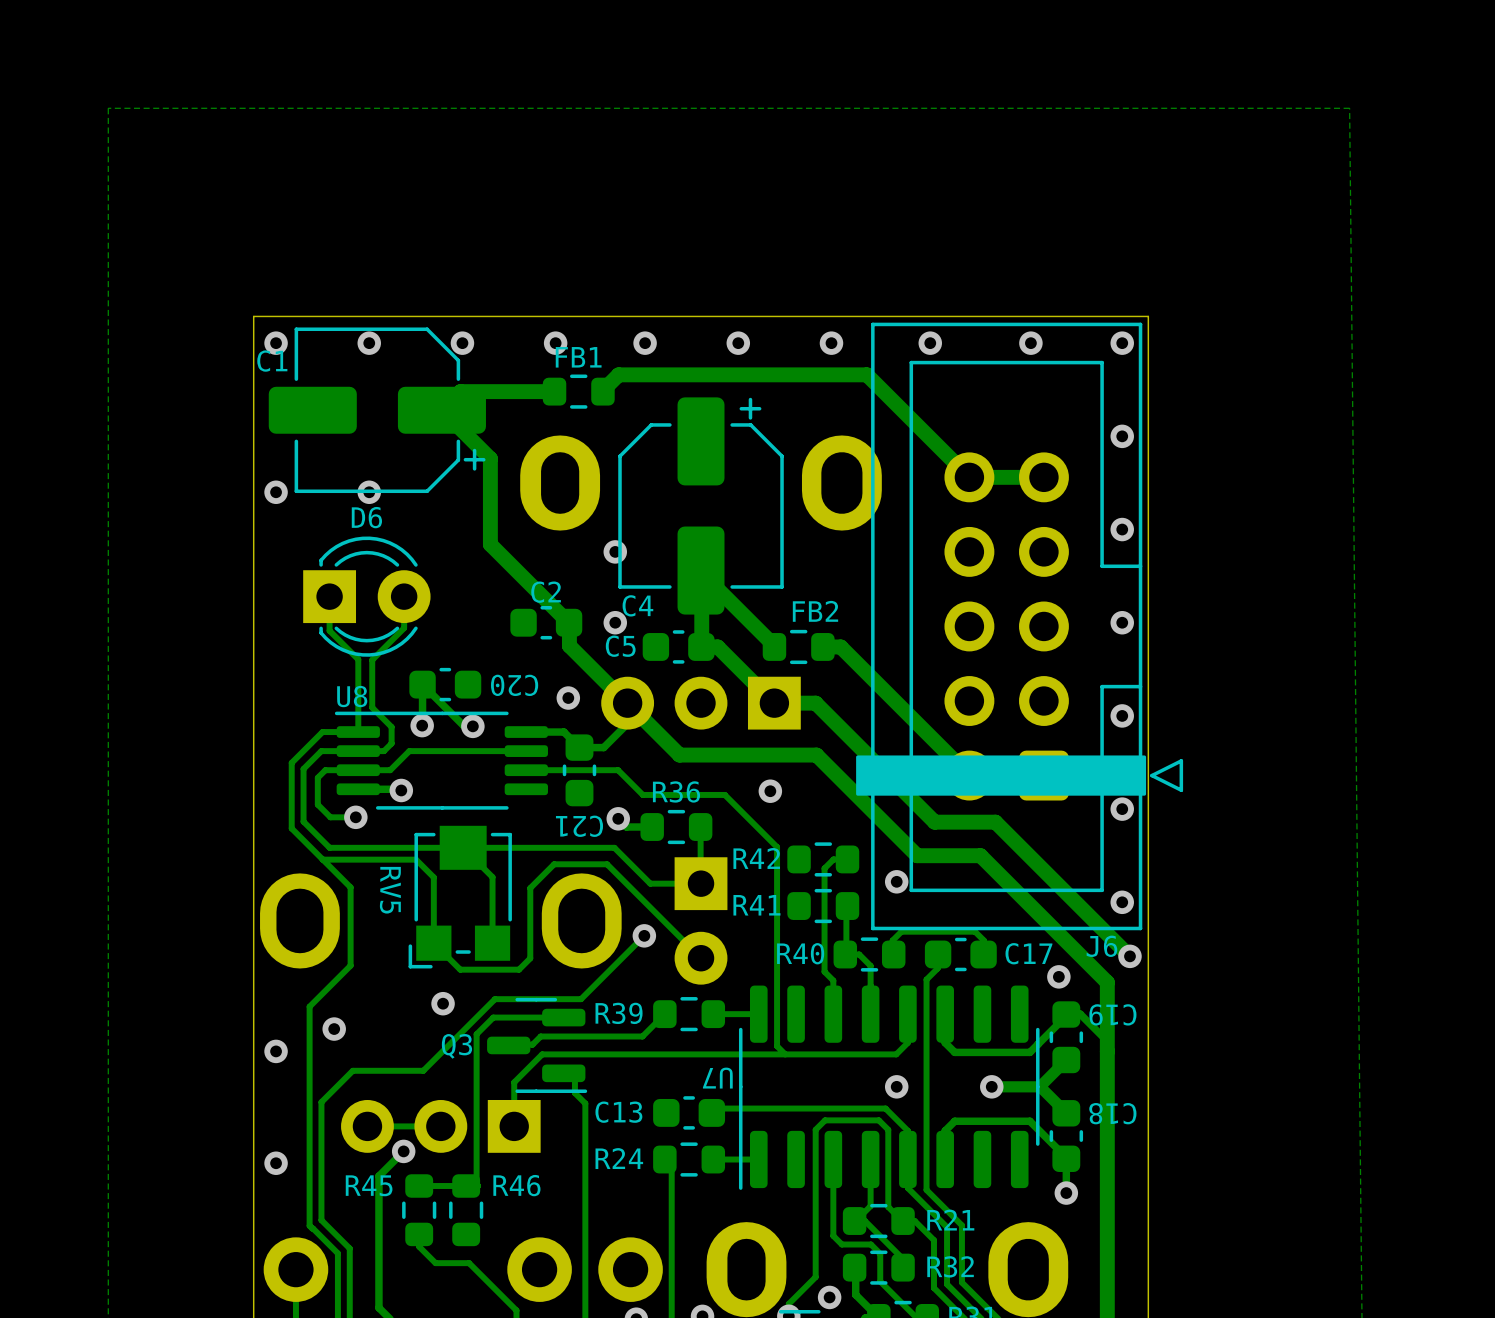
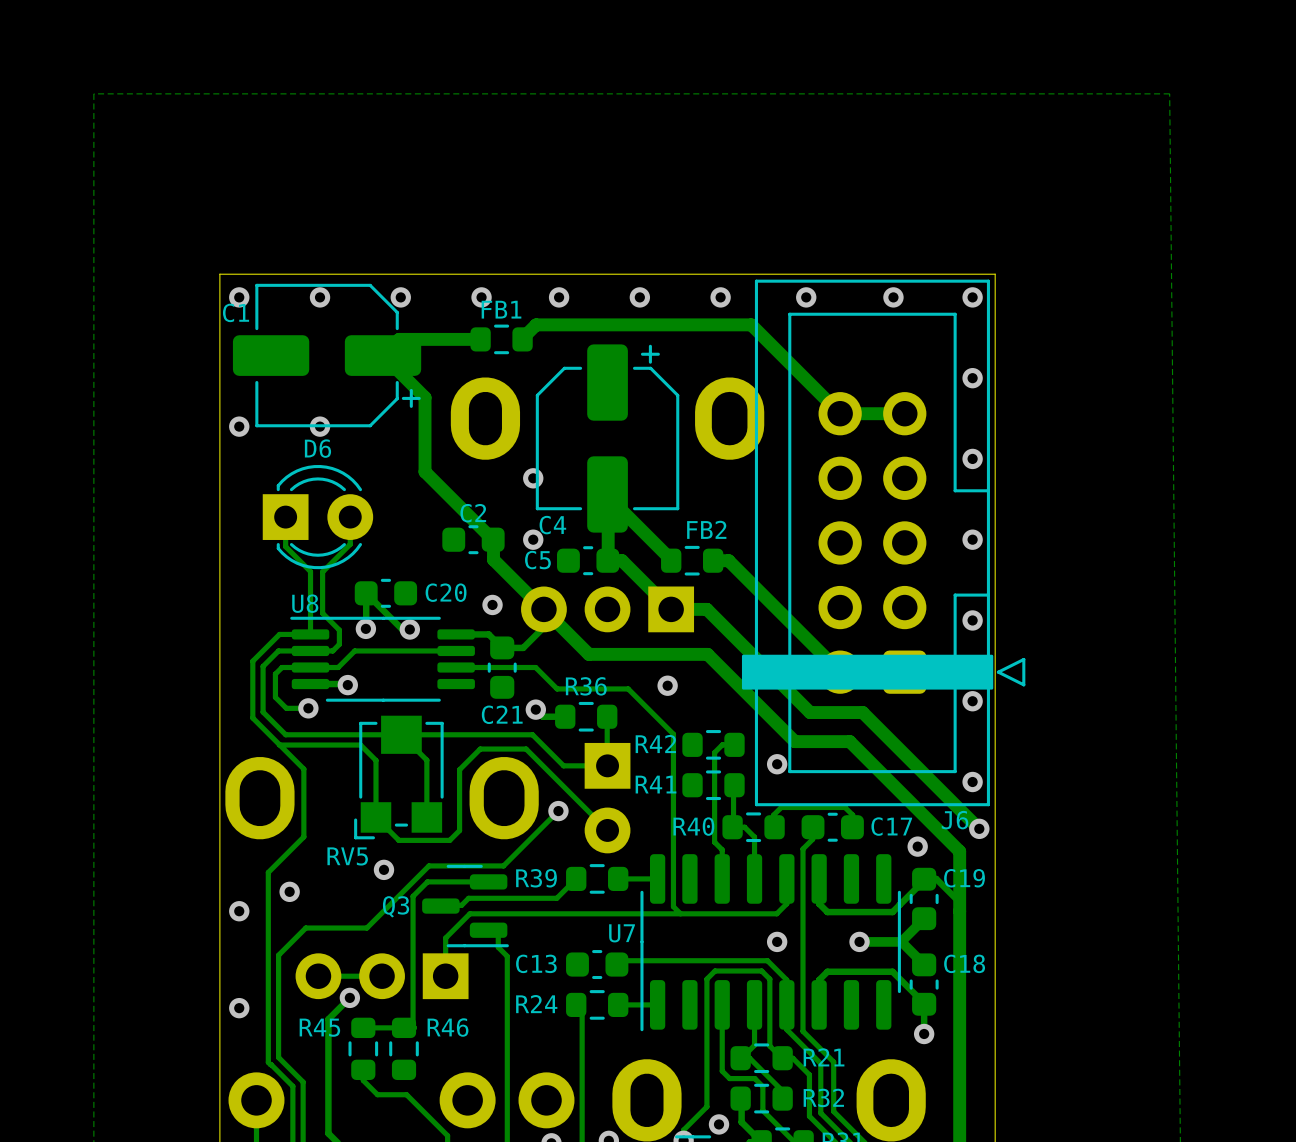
C20 name rotation: 0° (514, 685) -> 180° (446, 592)
C21 name rotation: 0° (579, 826) -> 180° (502, 714)
RV5 name rotation: 0° (390, 890) -> 90° counterclockwise (347, 856)
RV5 name position: RV5 (390, 890) -> RV5 (347, 856)
C19 name rotation: 0° (1112, 1014) -> 180° (964, 878)
U7 name rotation: 0° (717, 1078) -> 180° (622, 933)
C18 name rotation: 0° (1112, 1113) -> 180° (964, 963)

